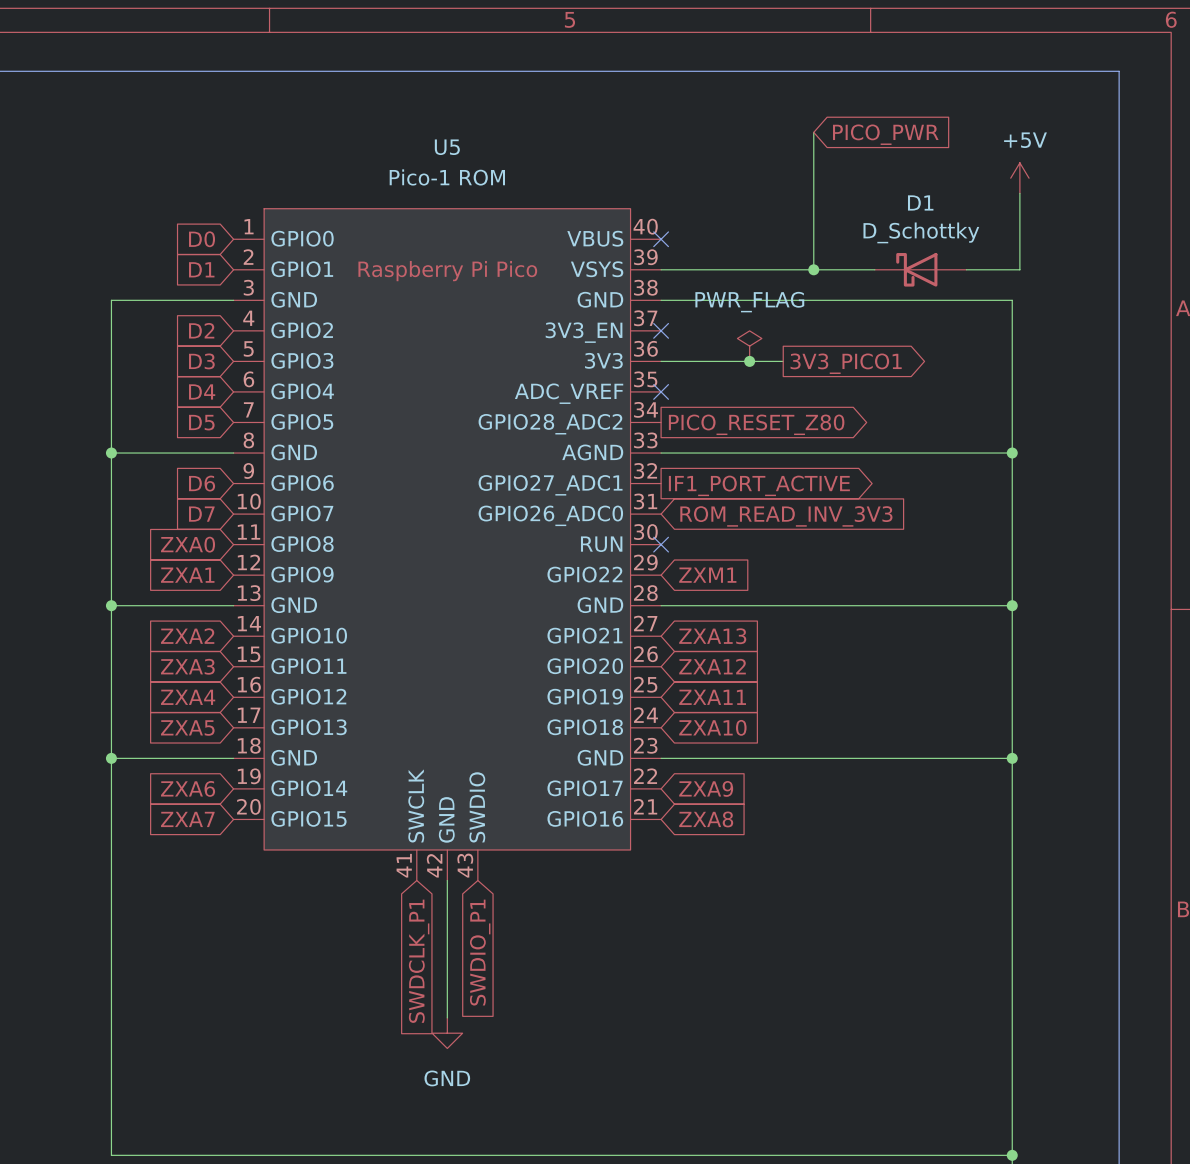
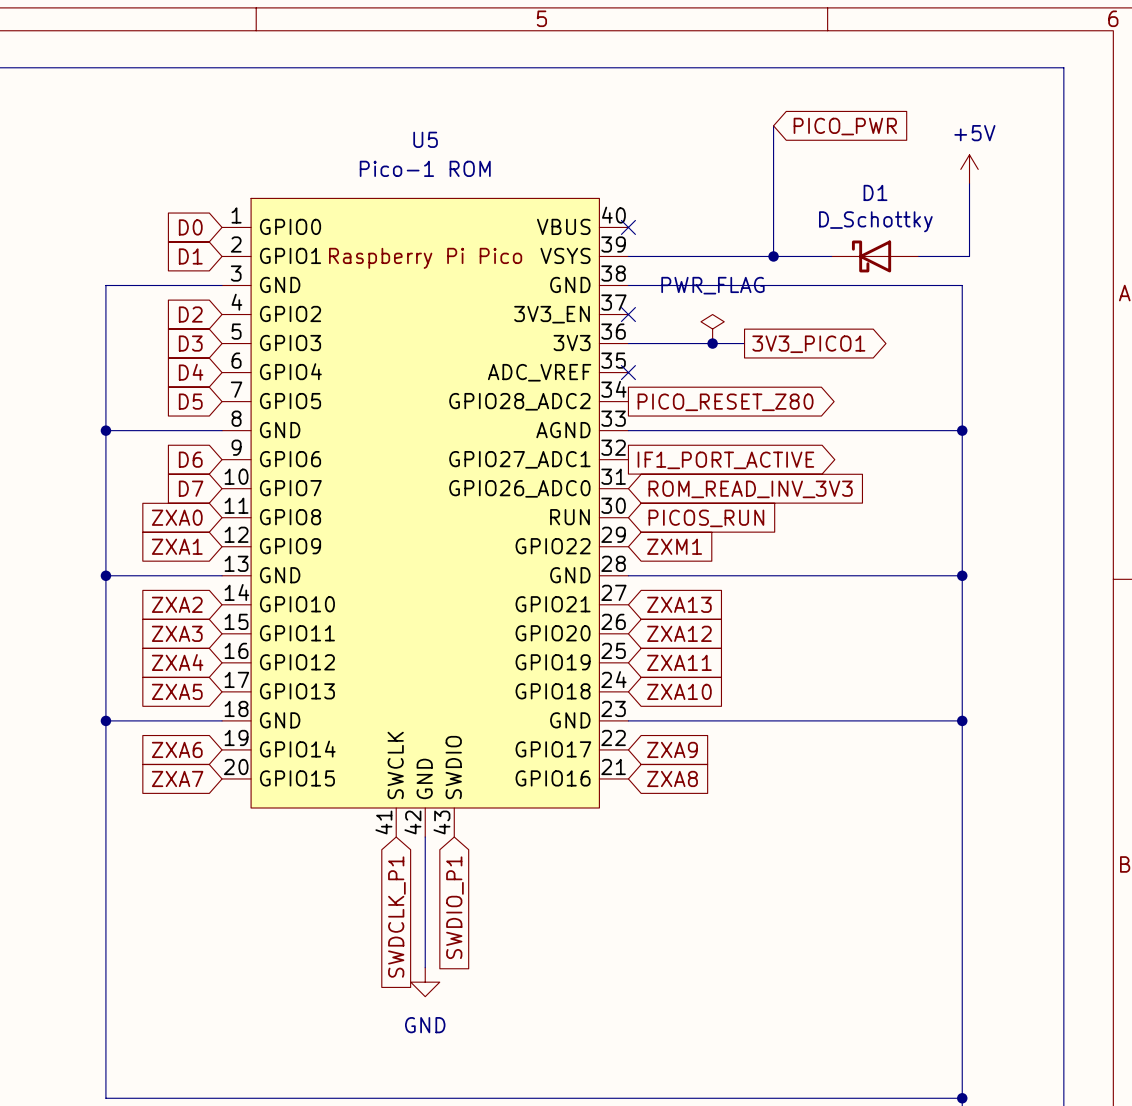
no-connect mark: (661, 544) -> none
global label: none -> PICOS_RUN (706, 518)

